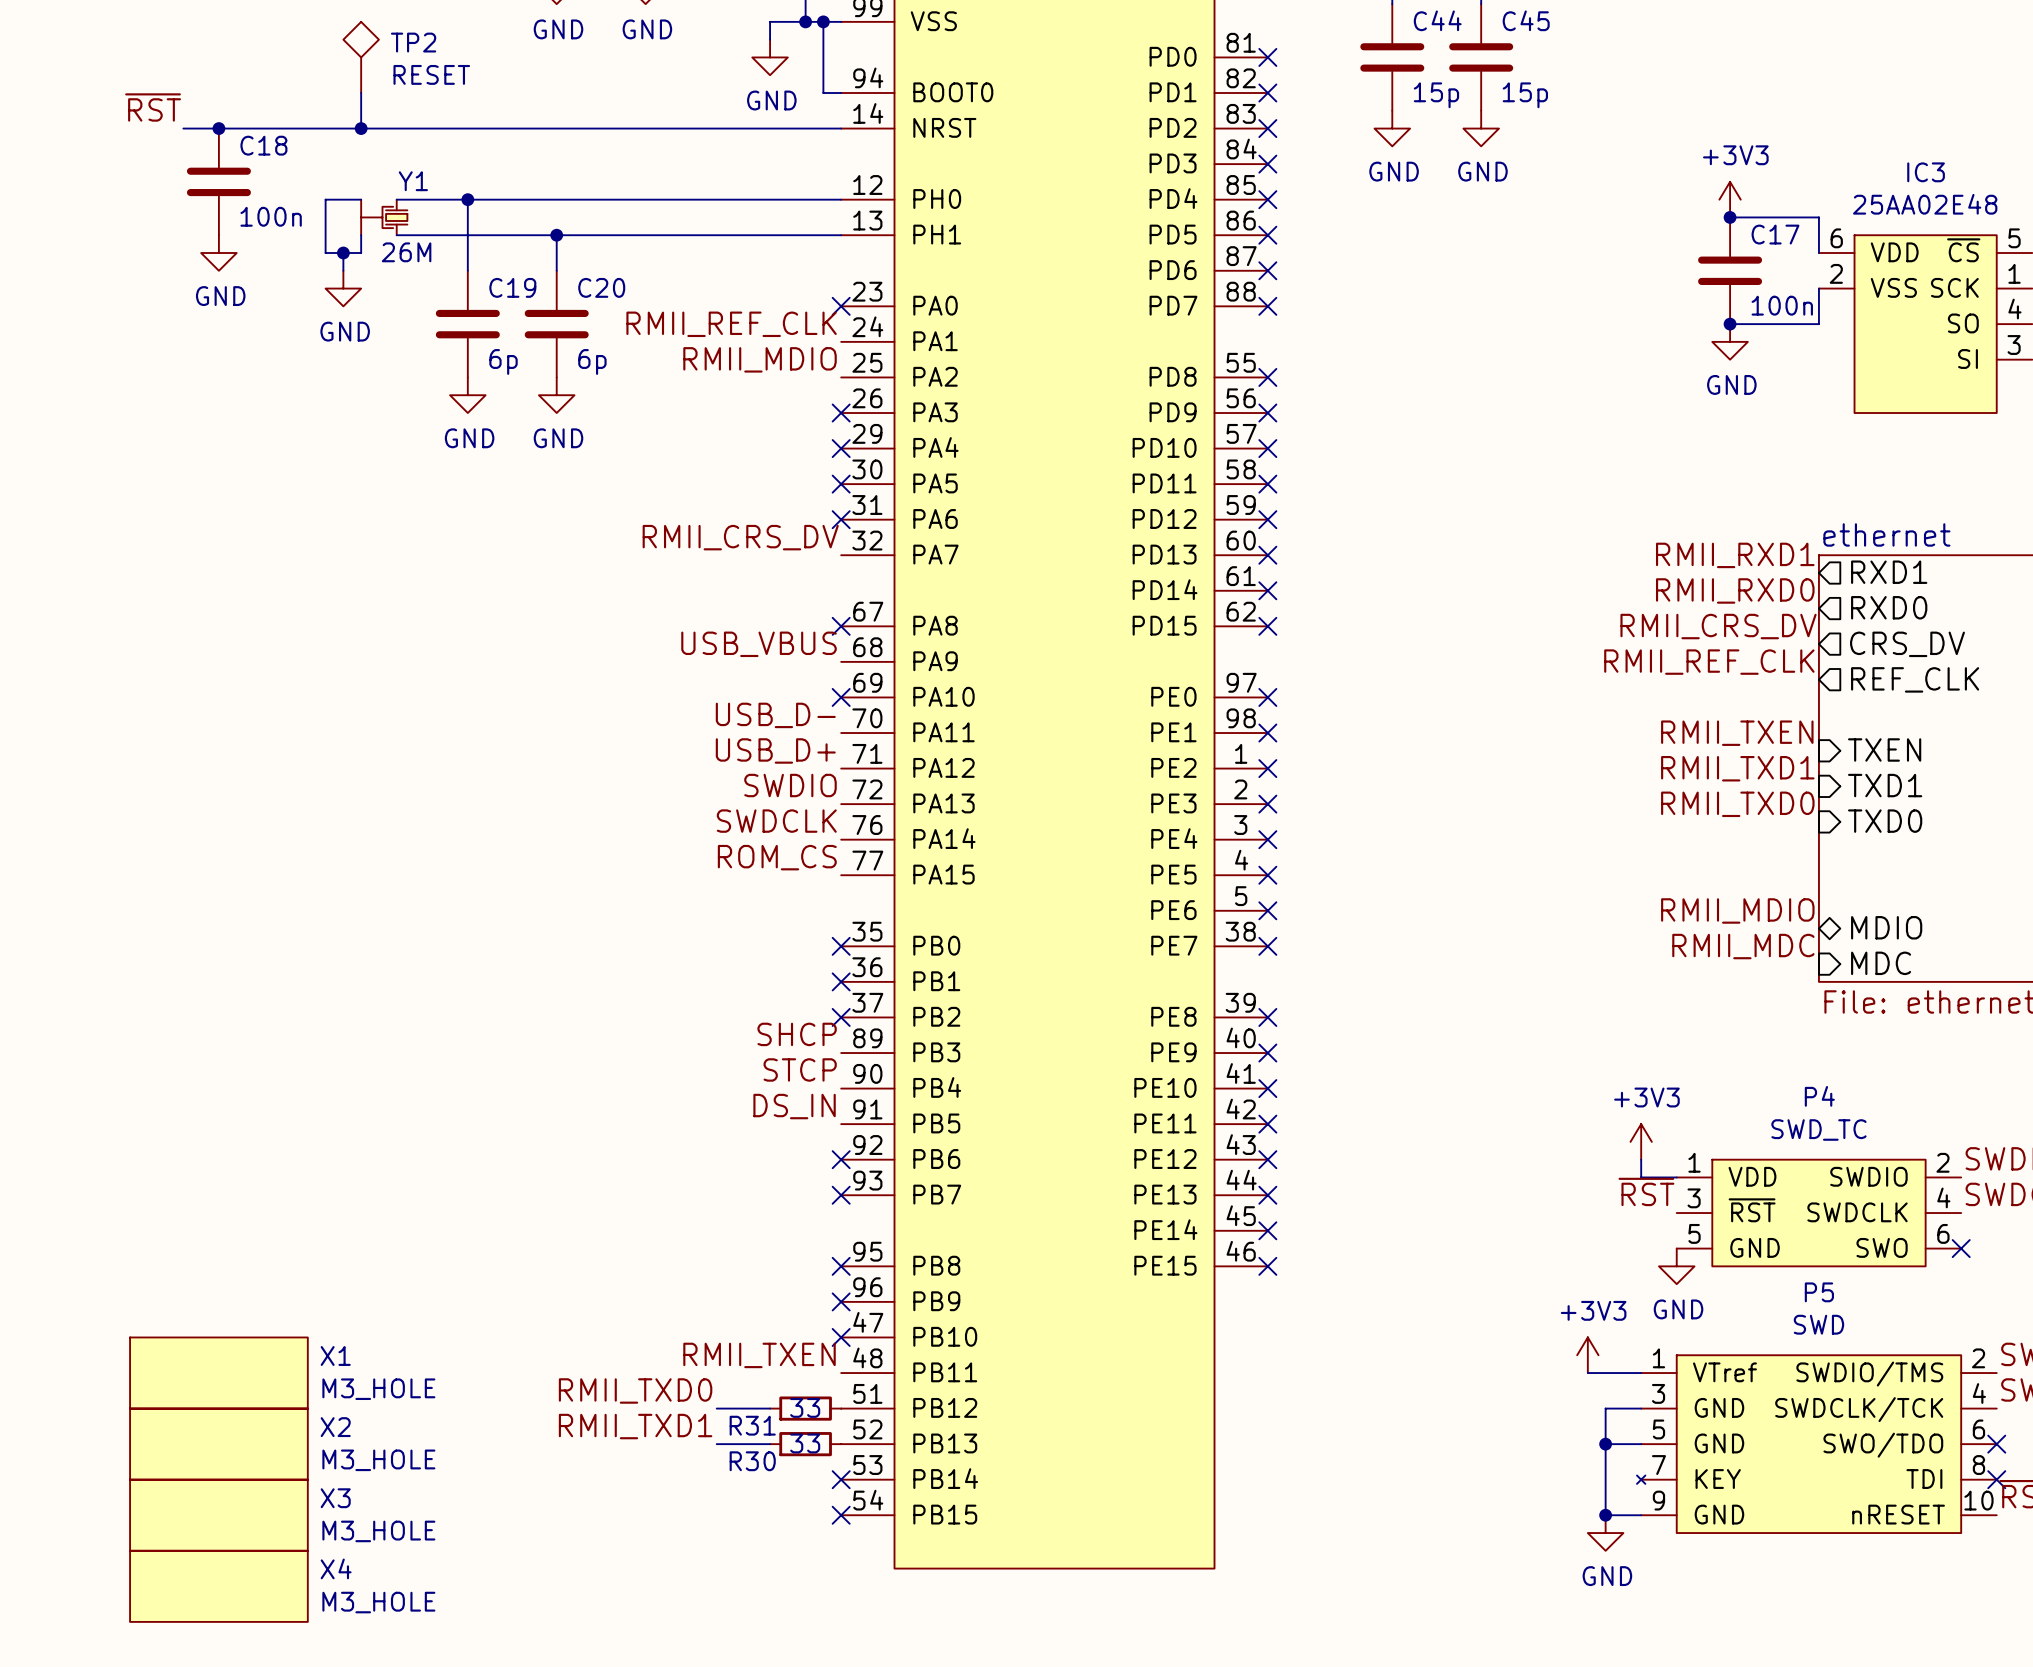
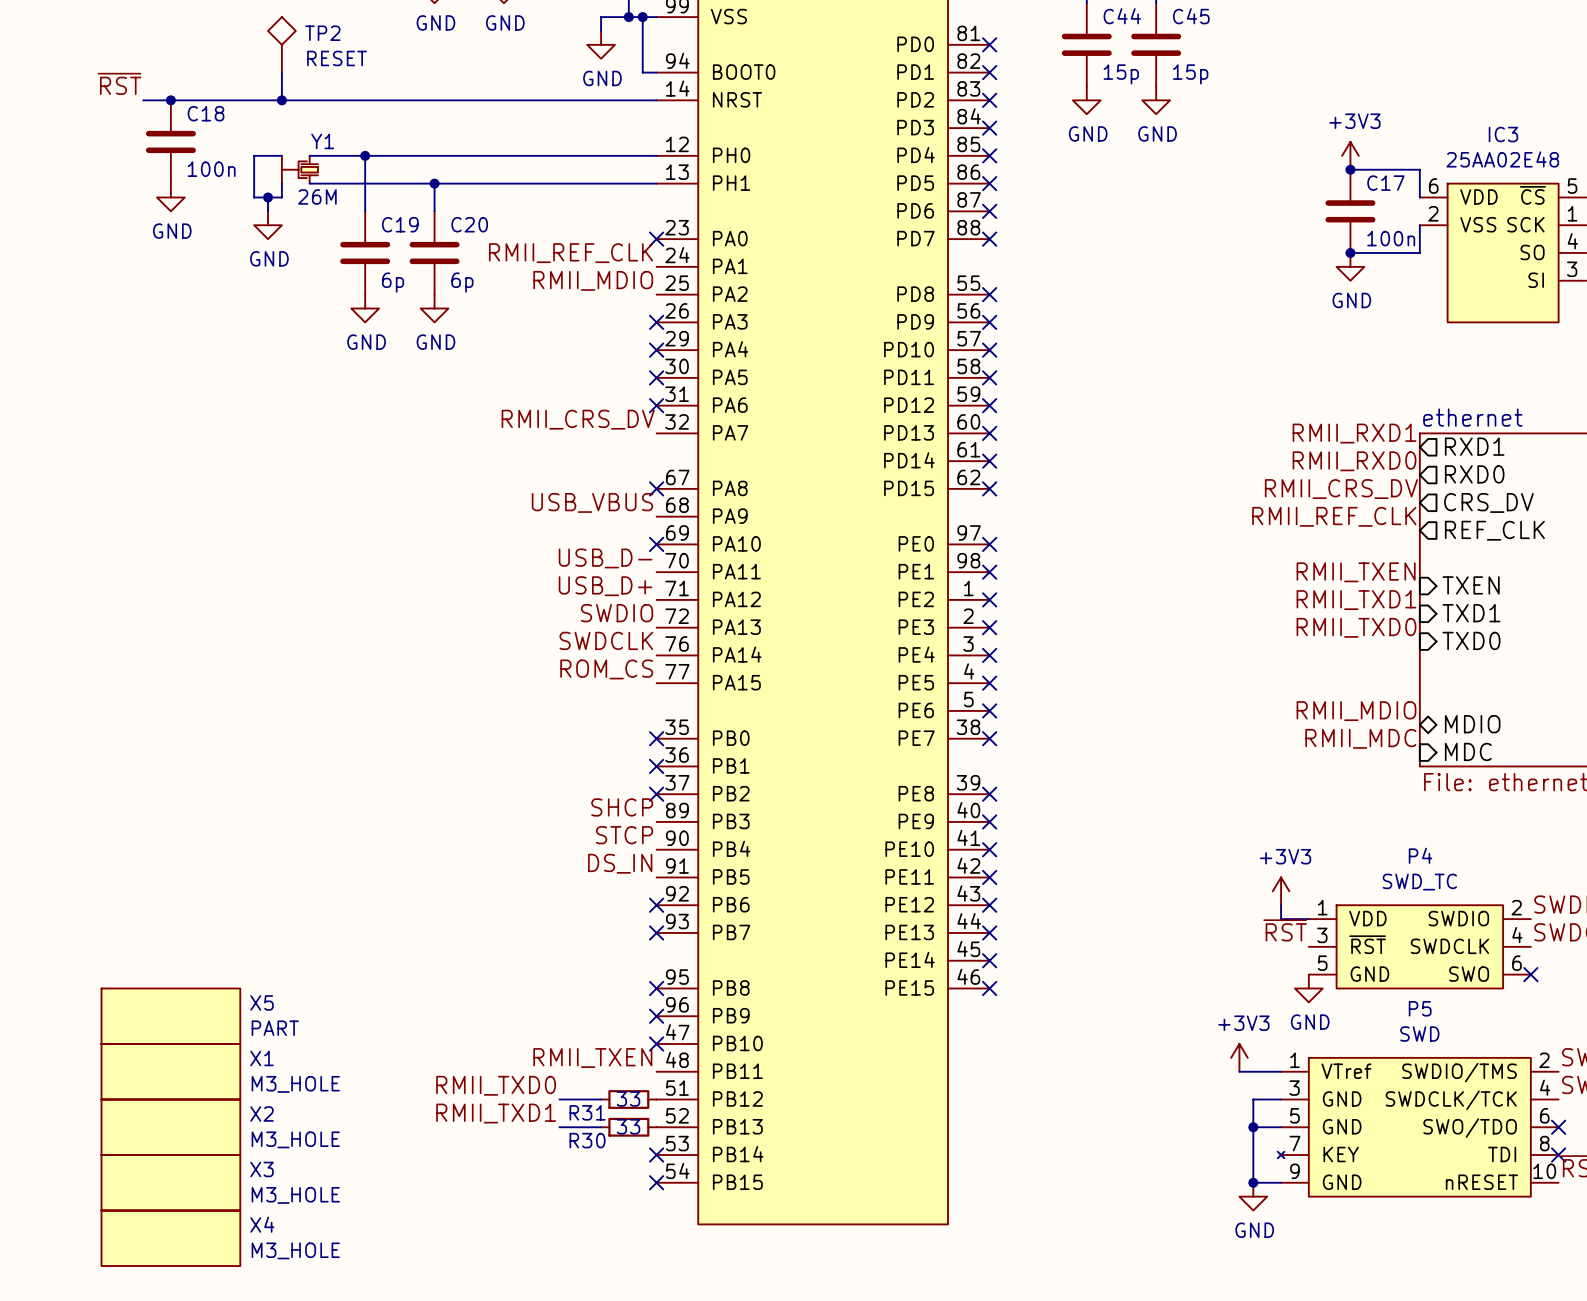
X5: none -> PART (170, 1016)

